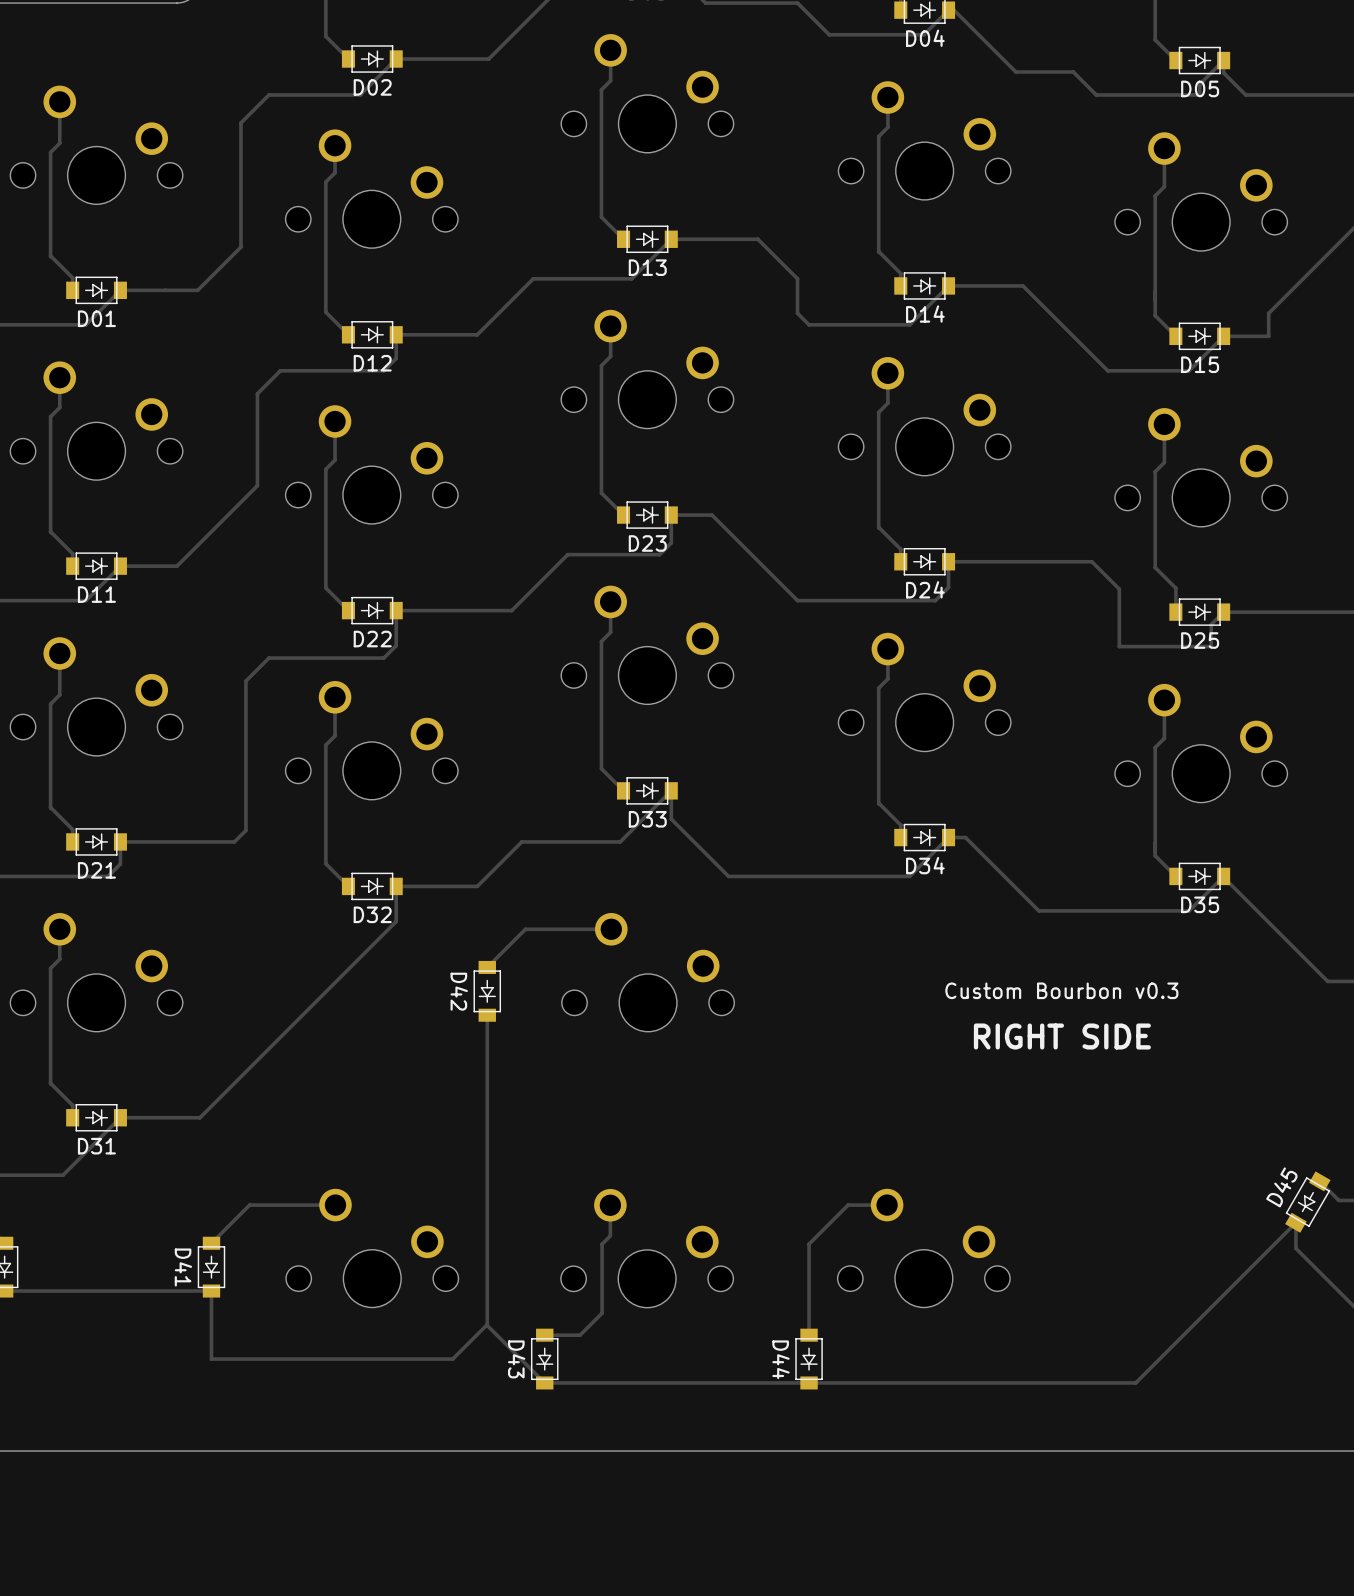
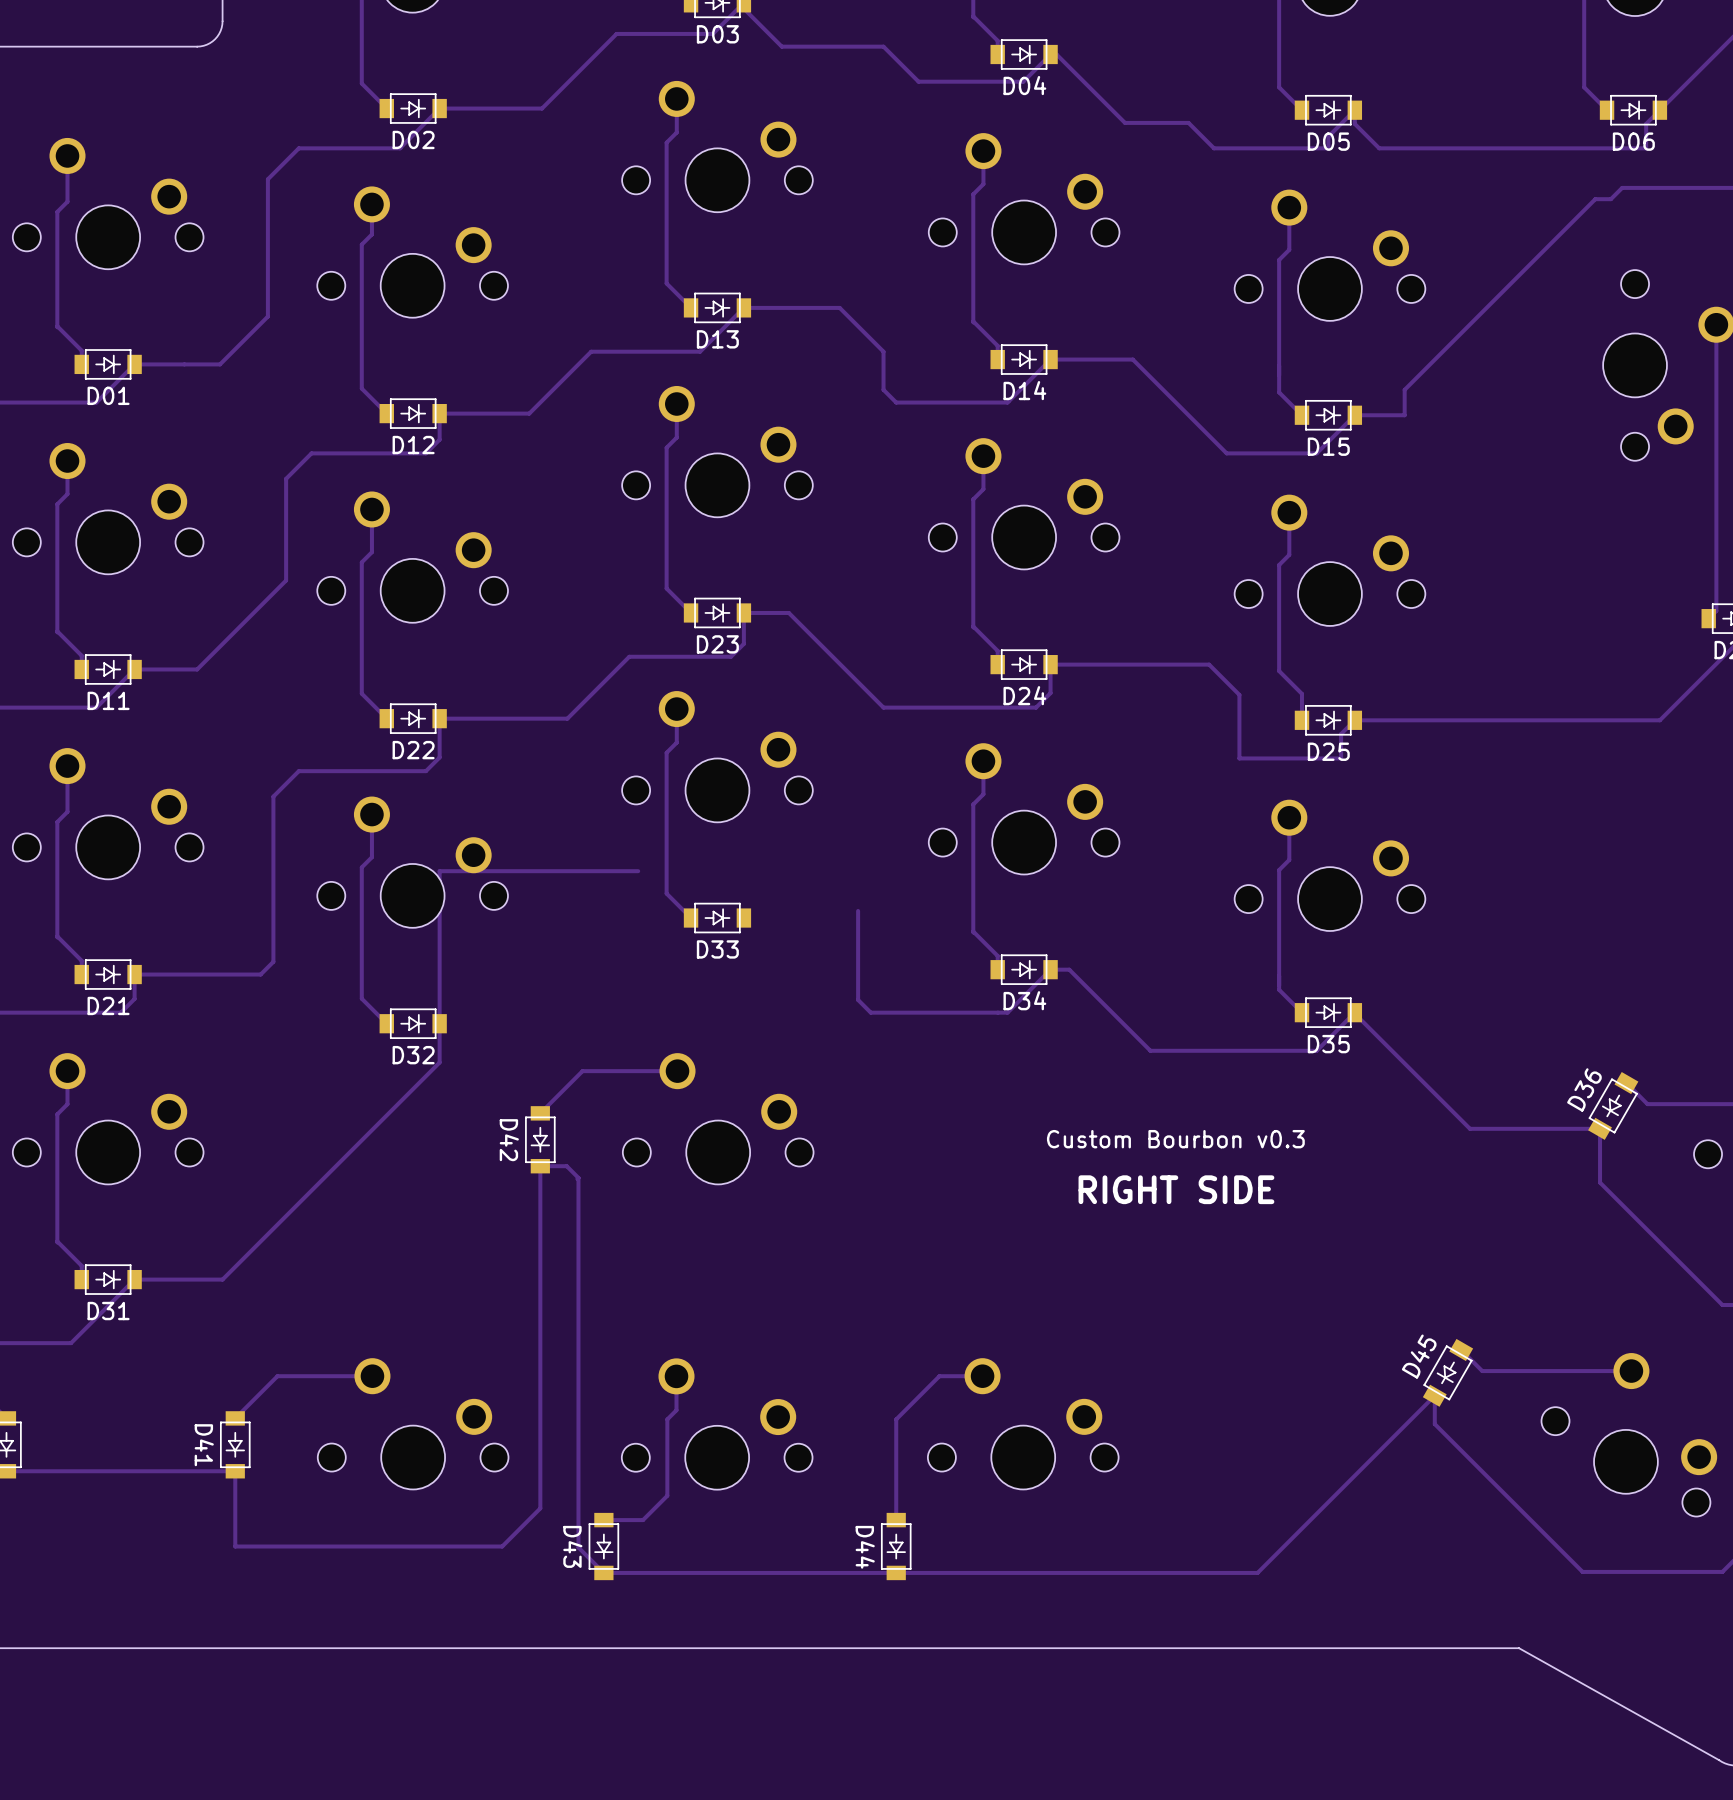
track: none -> (858, 910) (858, 999) (870, 1012)
track: (786, 876) (728, 876) (671, 819) (671, 790) (620, 841) (521, 841) (477, 886) (396, 886) -> (638, 871) (439, 871) (439, 1023)
track: none -> (540, 1166) (566, 1166) (578, 1177)
track: (487, 1324) (521, 1359) -> (578, 1177) (578, 1547)

